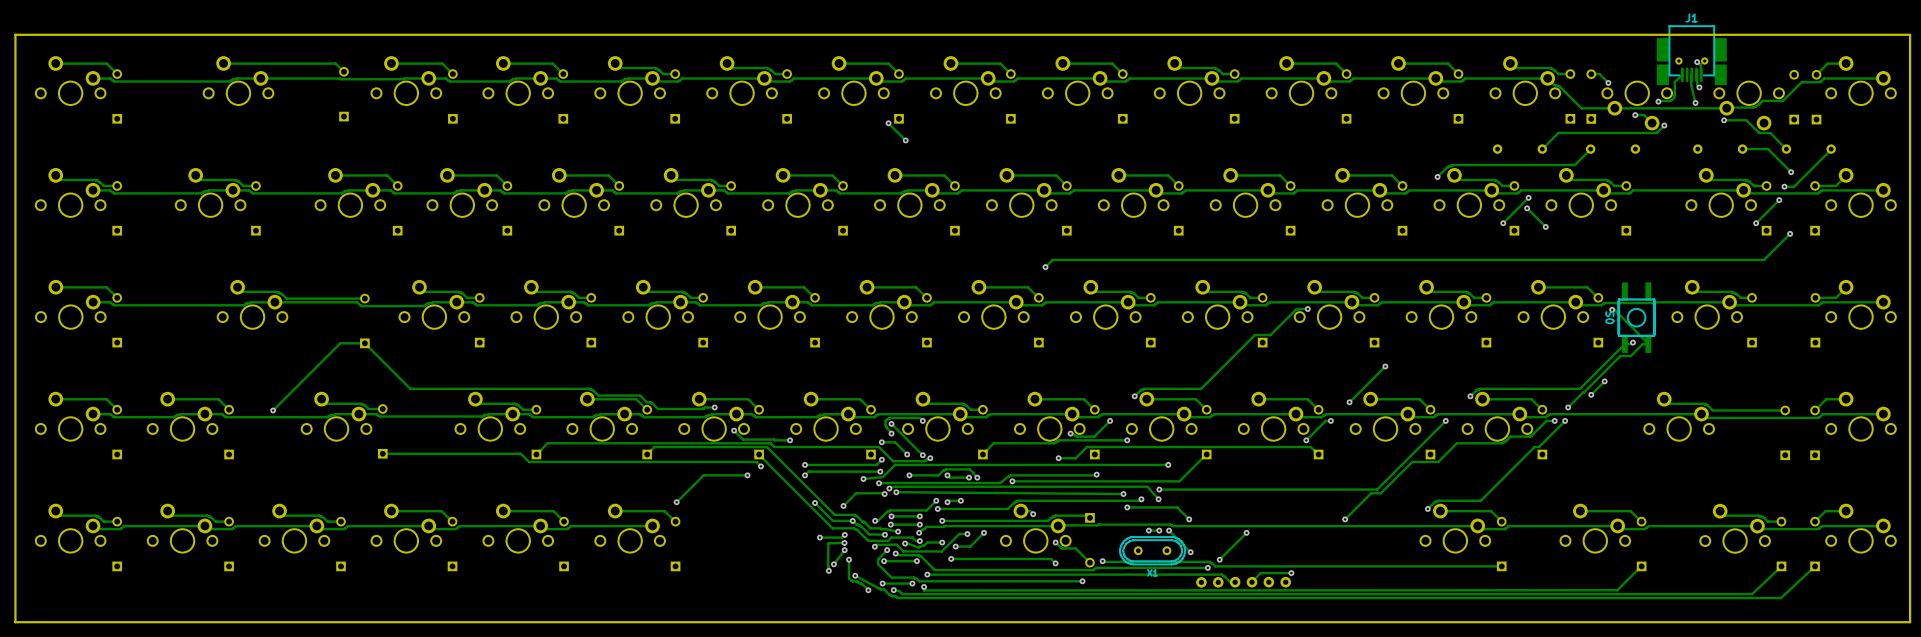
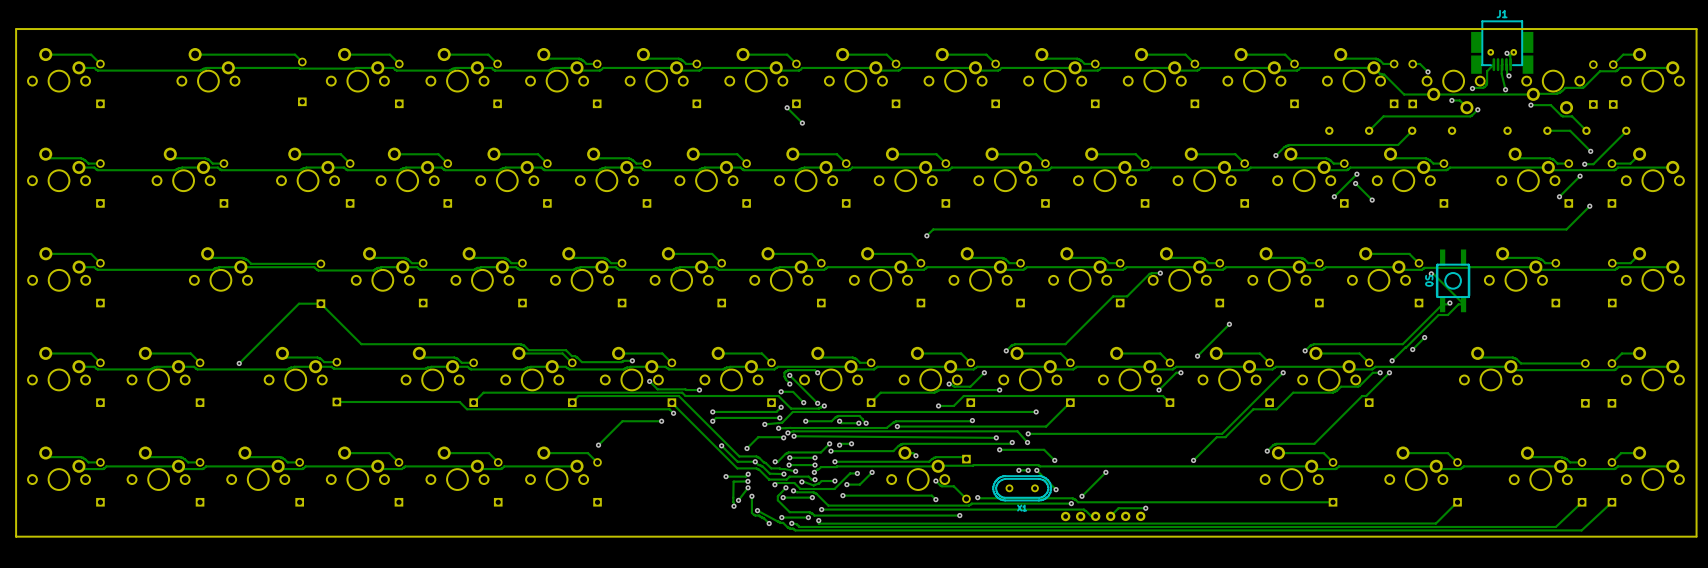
board edge: (22, 34) (15, 34) (15, 622) (1910, 622) (1910, 604) -> (16, 536) (1696, 536)
board edge: none -> (16, 29) (16, 536)

